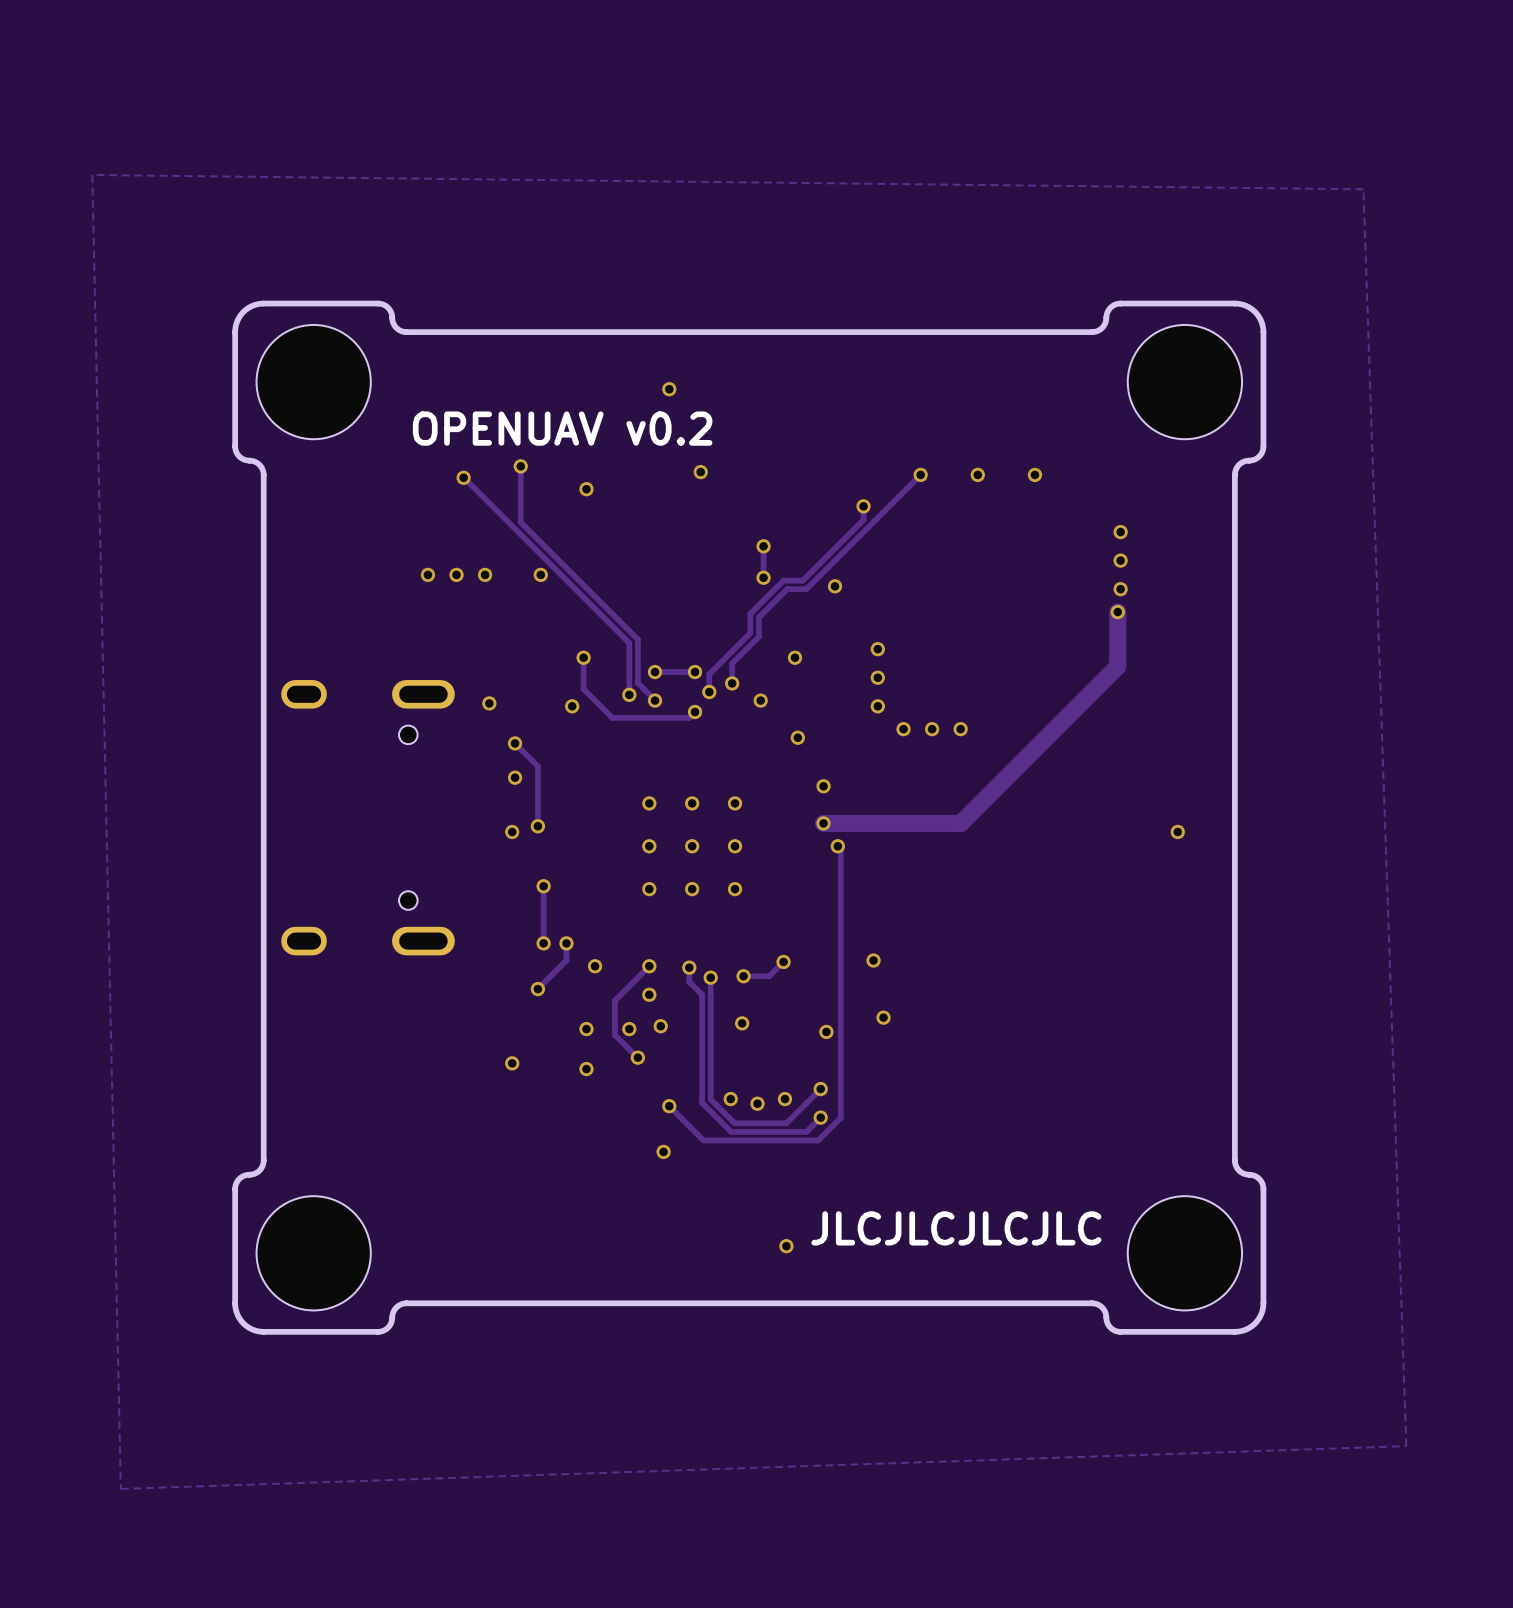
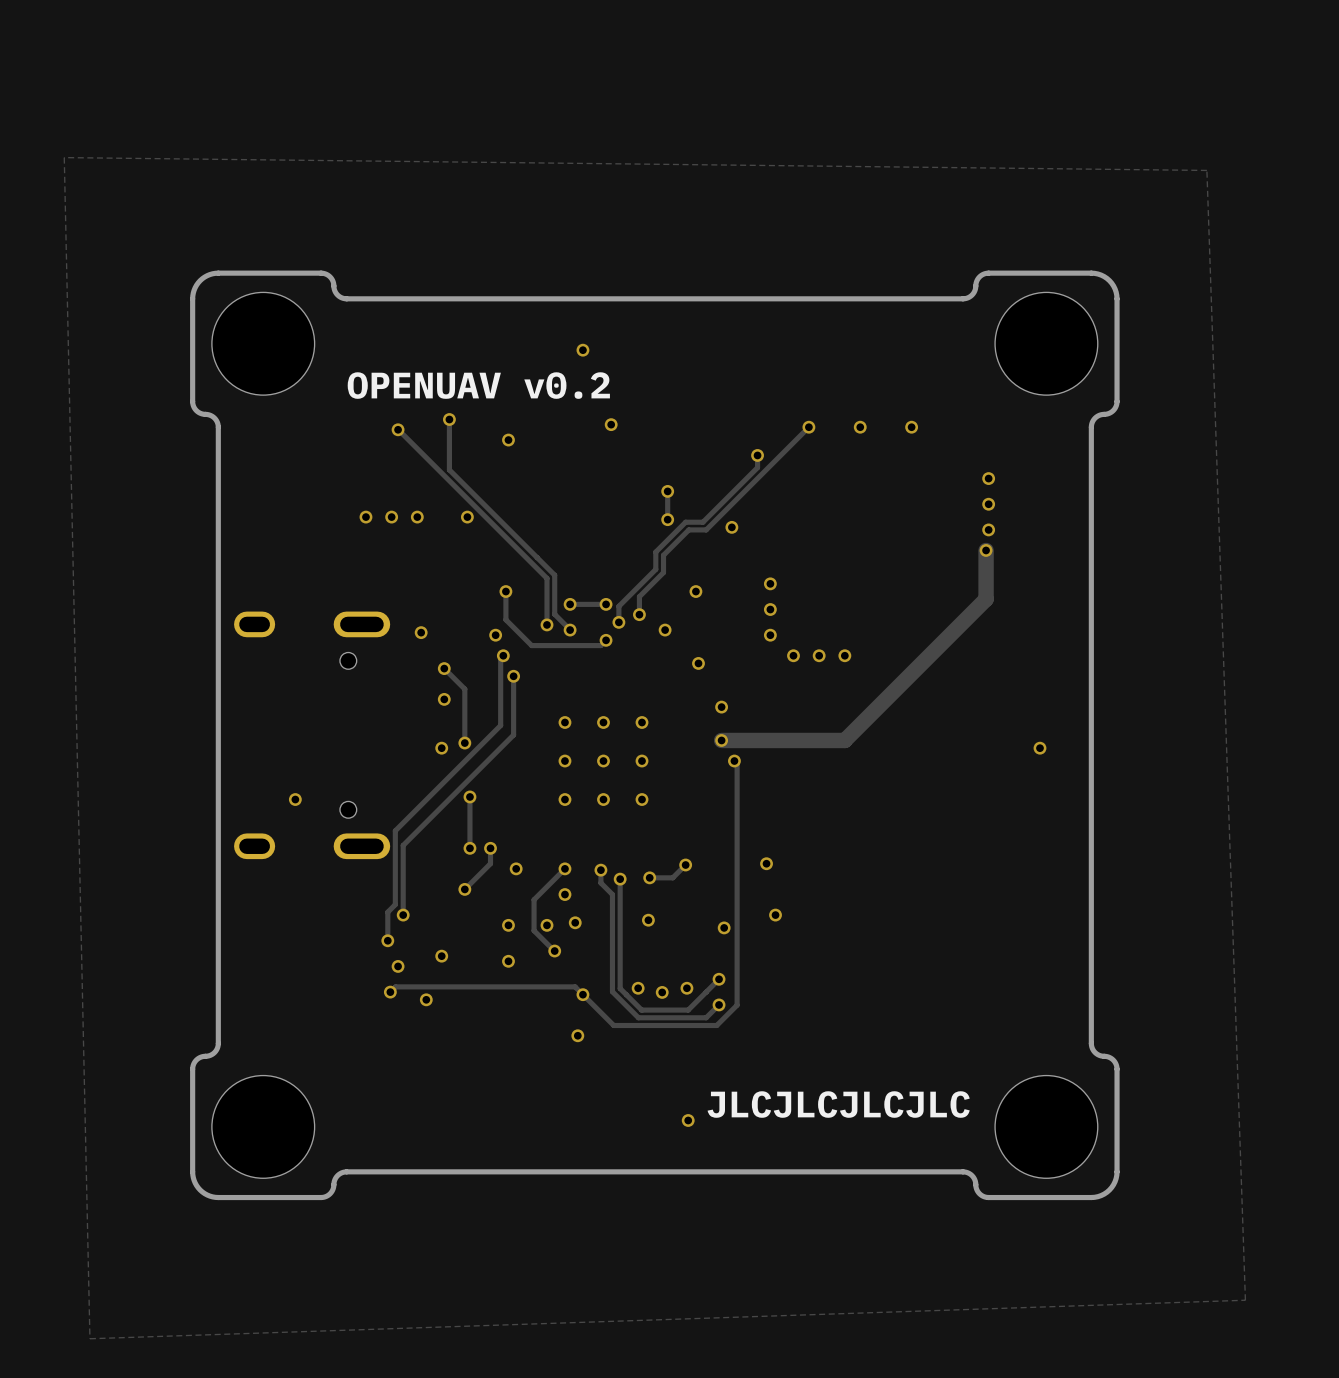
track: none -> (503, 655) (500, 658) (500, 725) (395, 830) (395, 904) (387, 912) (387, 940)
via: none -> (503, 655)
track: none -> (513, 676) (513, 735) (403, 845) (403, 915)
via: none -> (513, 676)
via: none -> (295, 799)
via: none -> (403, 915)
via: none -> (387, 940)
via: none -> (398, 966)
track: none -> (390, 992) (395, 986) (575, 986) (582, 994)
via: none -> (390, 992)
via: none -> (426, 999)

